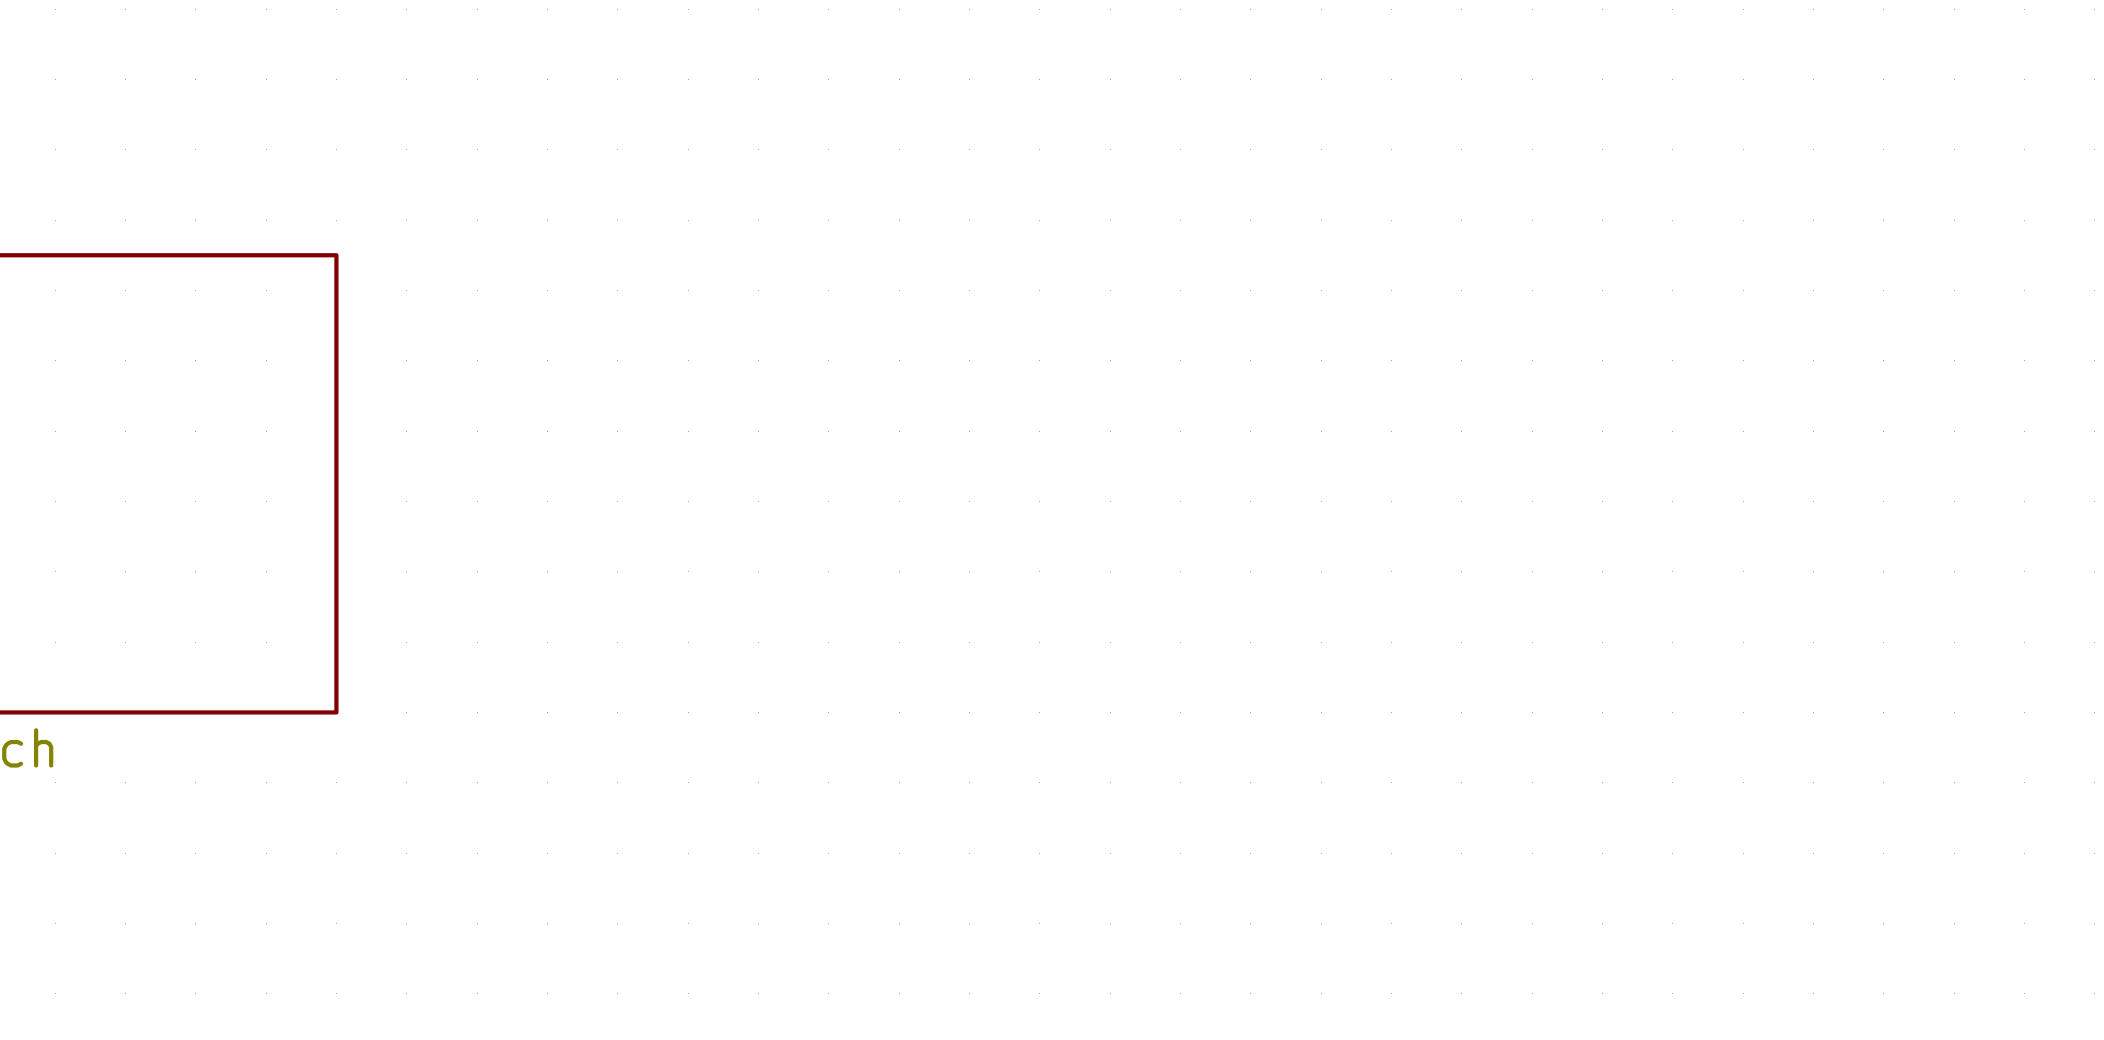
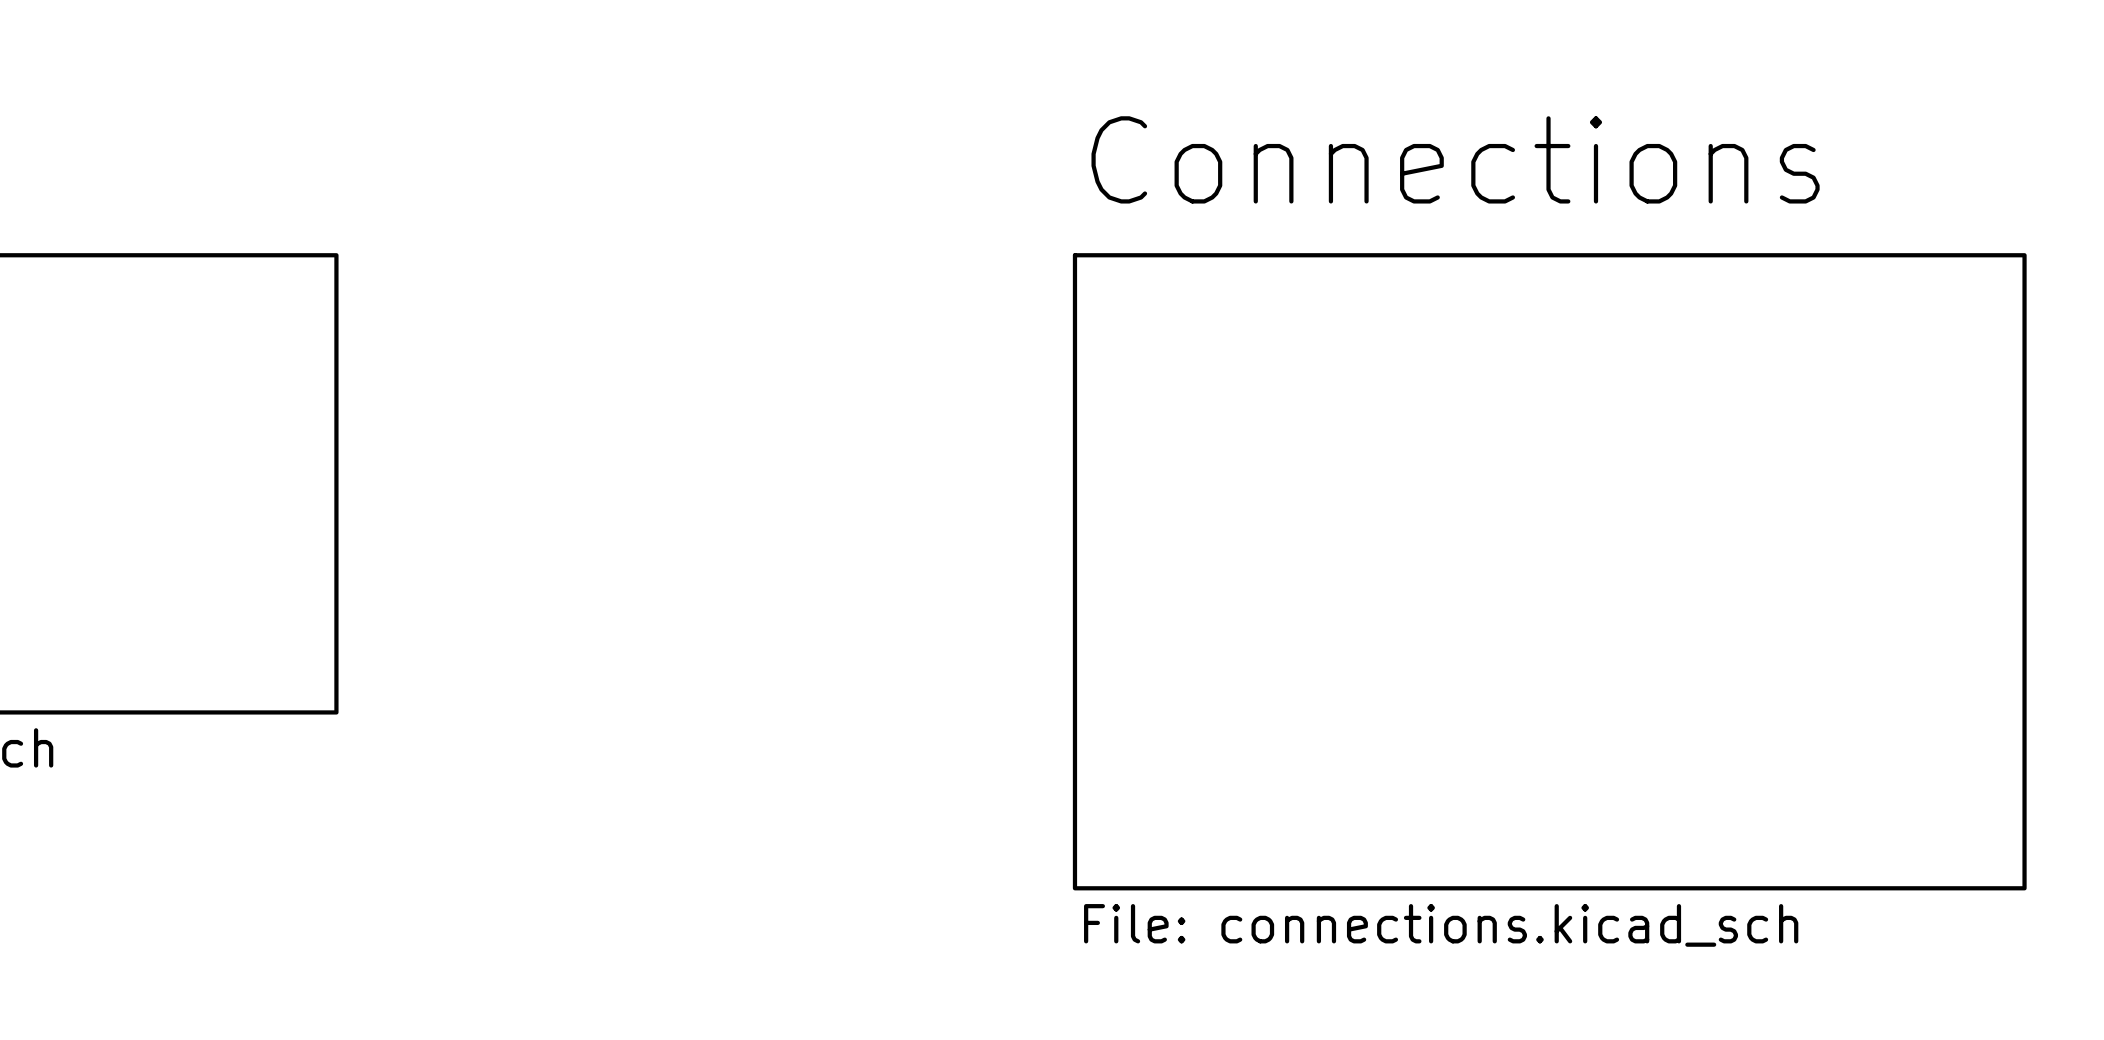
sheet Connections: none -> File: connections.kicad_sch (1549, 571)

